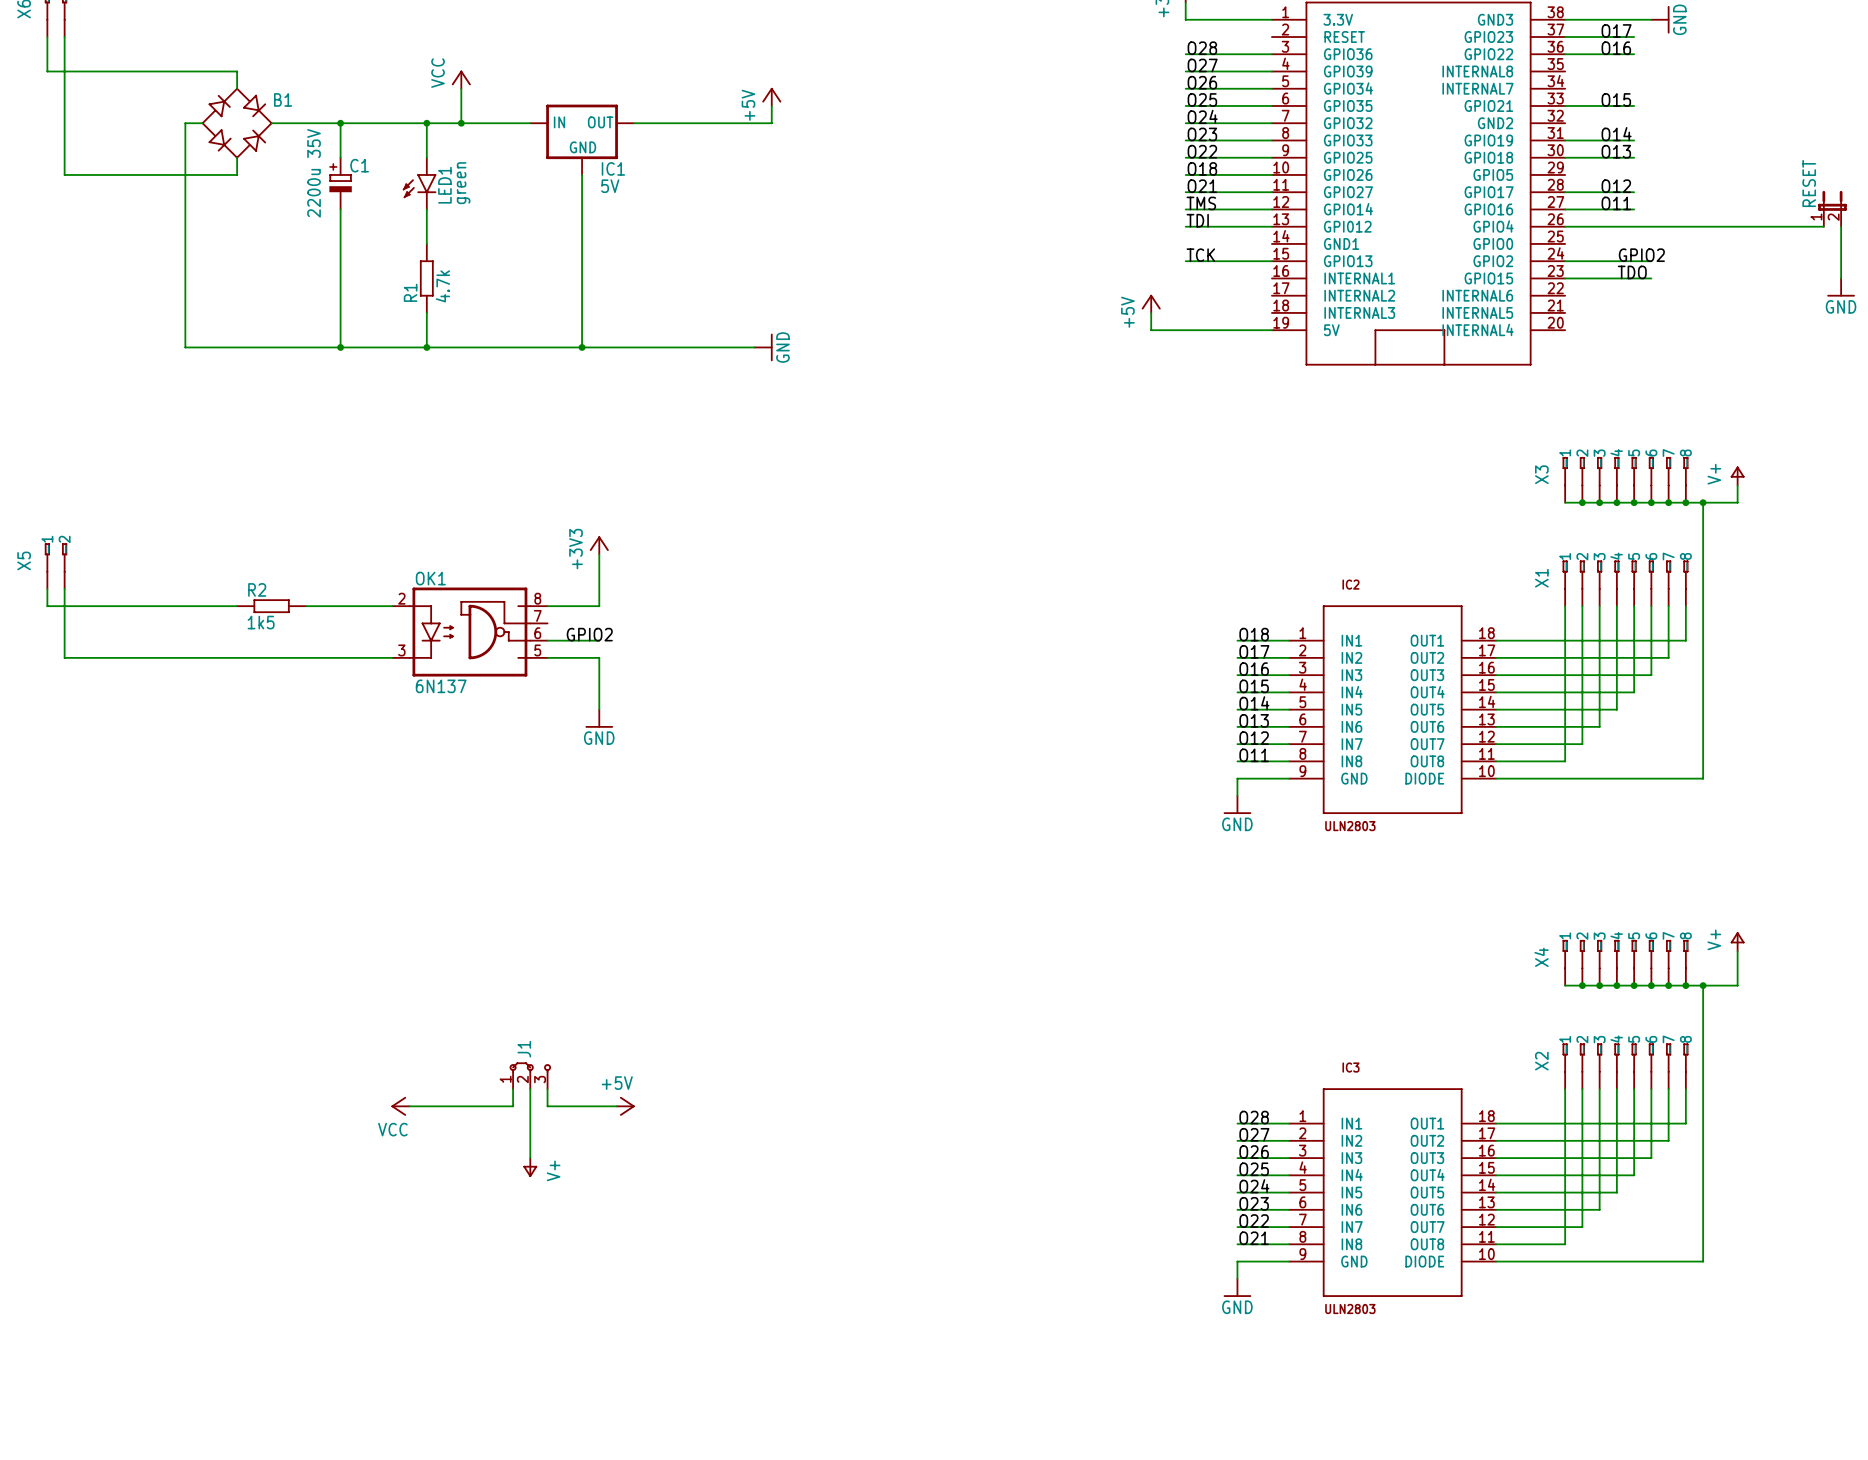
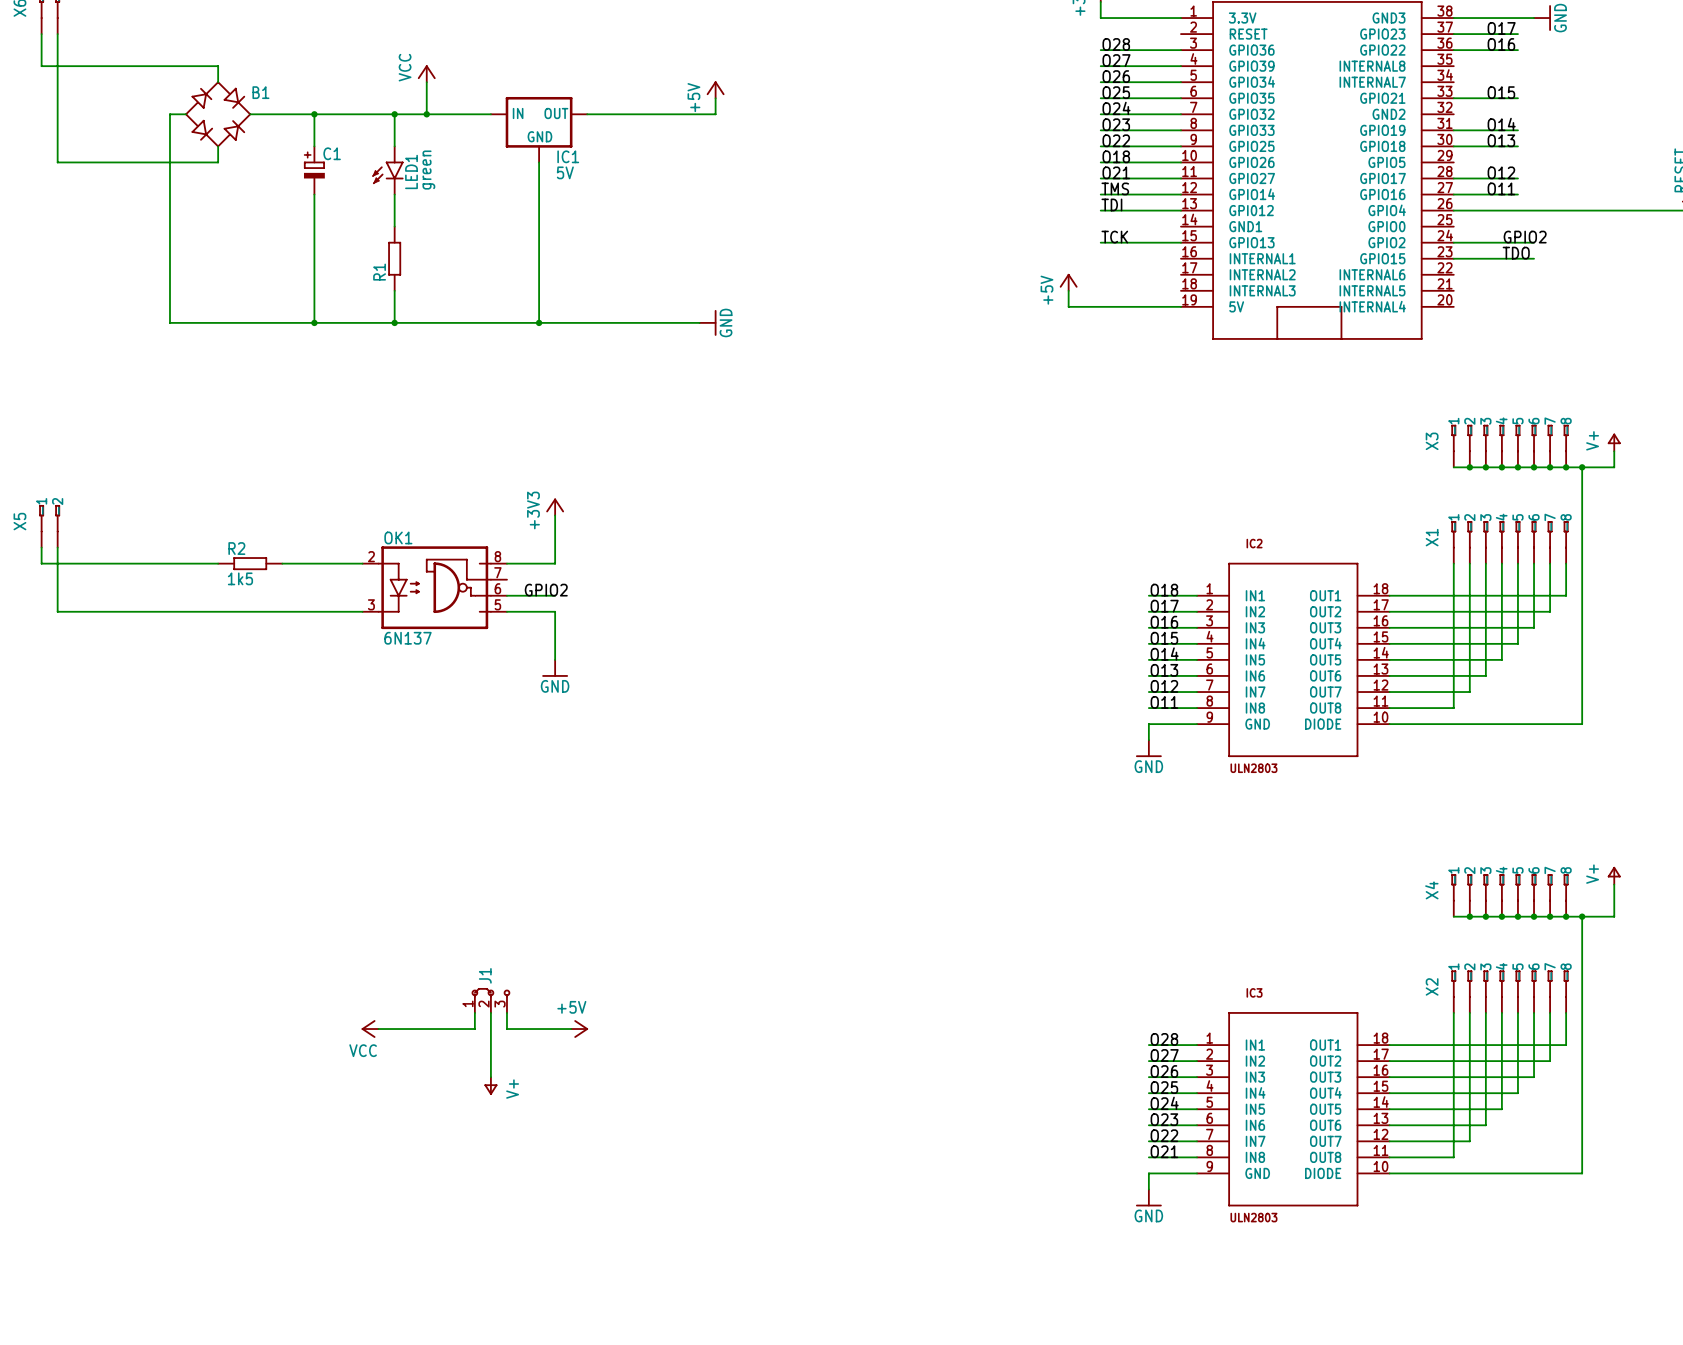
C1 value: 2200u 35V (314, 173) -> none
R1 value: 4.7k (442, 286) -> none

